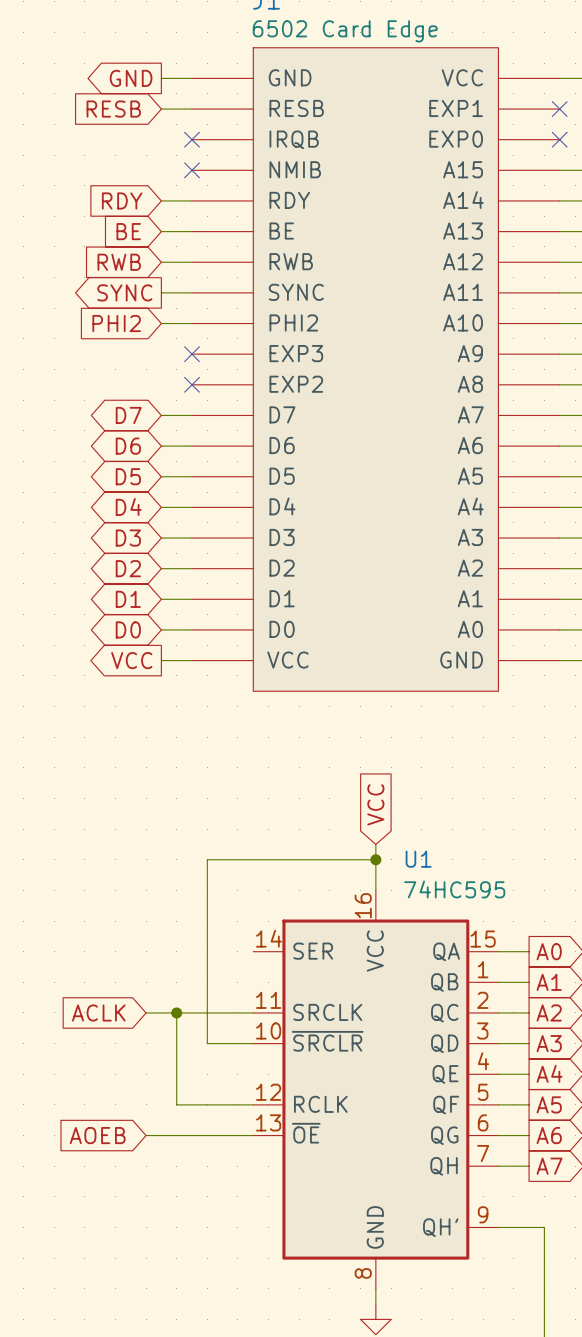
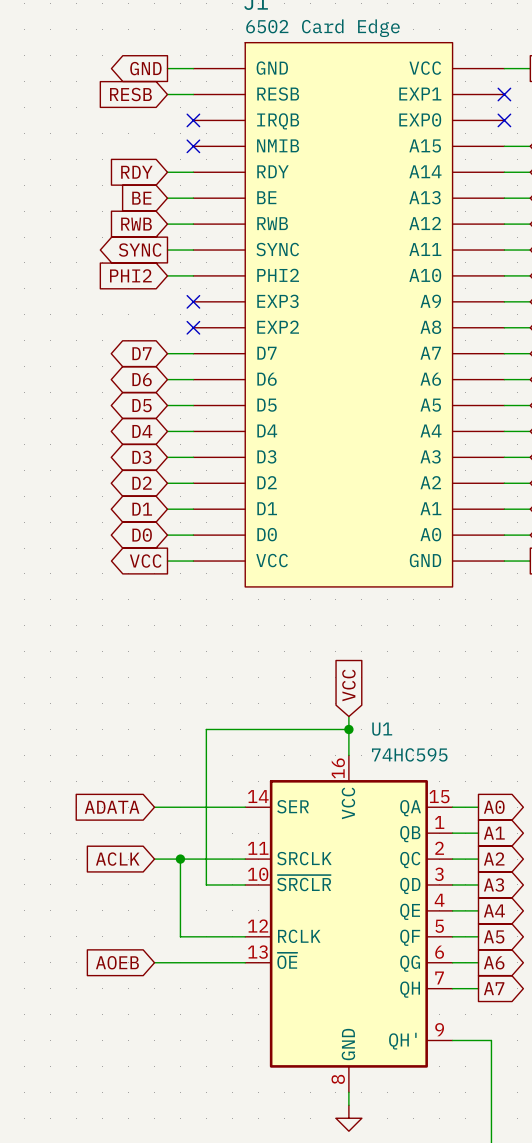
global label: none -> ADATA (112, 807)
wire: none -> (154, 807) (245, 807)

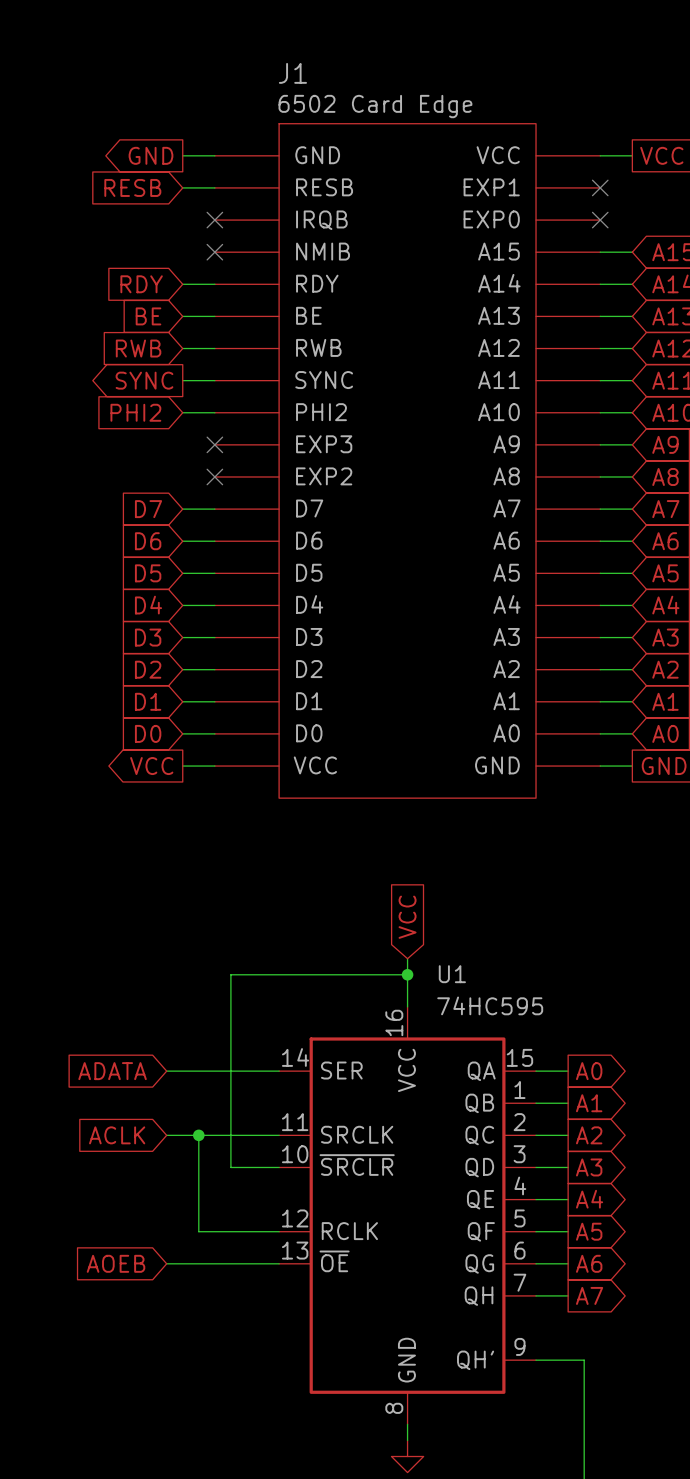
global label shape: bidirectional (142, 353) -> input (148, 509)
global label shape: bidirectional (142, 379) -> input (148, 541)
global label shape: bidirectional (142, 405) -> input (148, 573)
global label shape: bidirectional (142, 431) -> input (148, 605)
global label shape: bidirectional (141, 457) -> input (148, 637)
global label shape: bidirectional (142, 483) -> input (148, 669)
global label shape: bidirectional (142, 509) -> input (148, 701)
global label shape: bidirectional (142, 535) -> input (148, 733)

